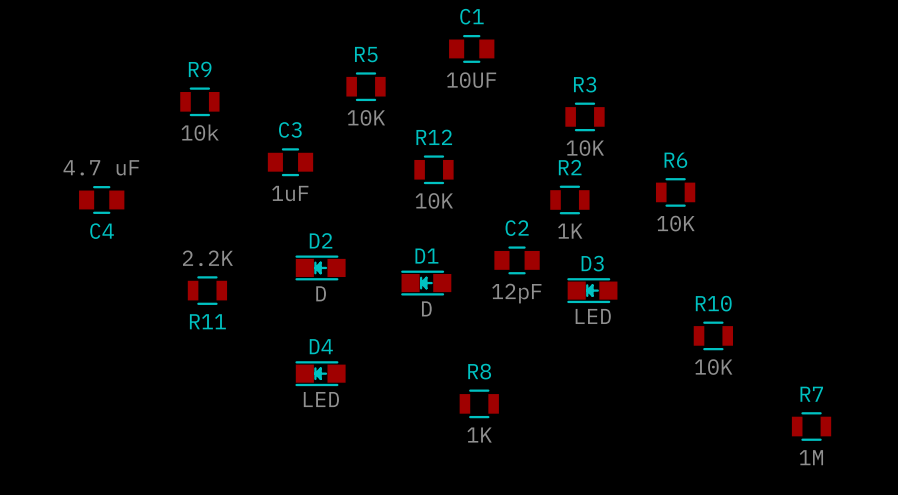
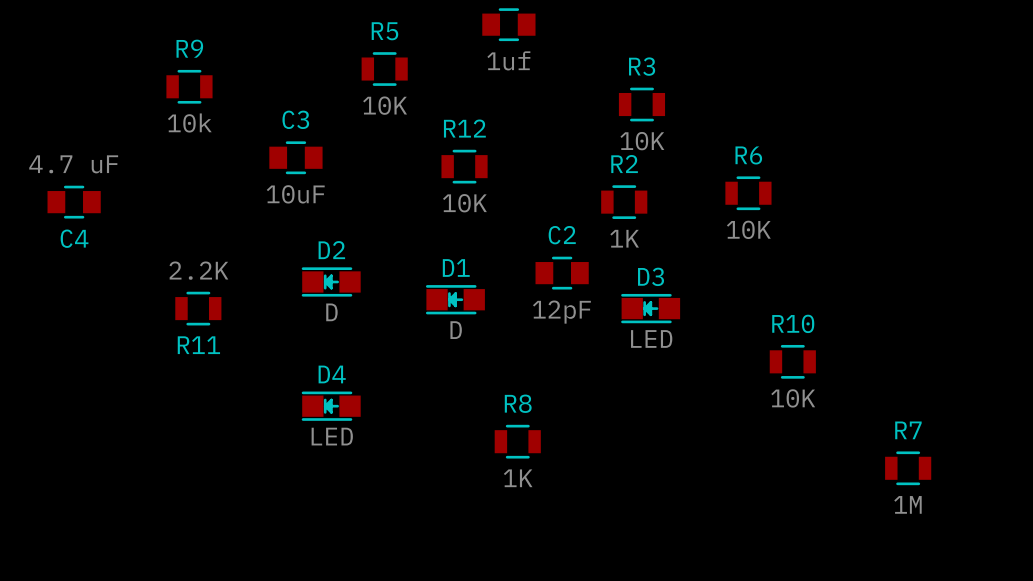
C1 value: 10UF (471, 80) -> 1uf (508, 60)
C3 value: 1uF (290, 193) -> 10uF (295, 194)

